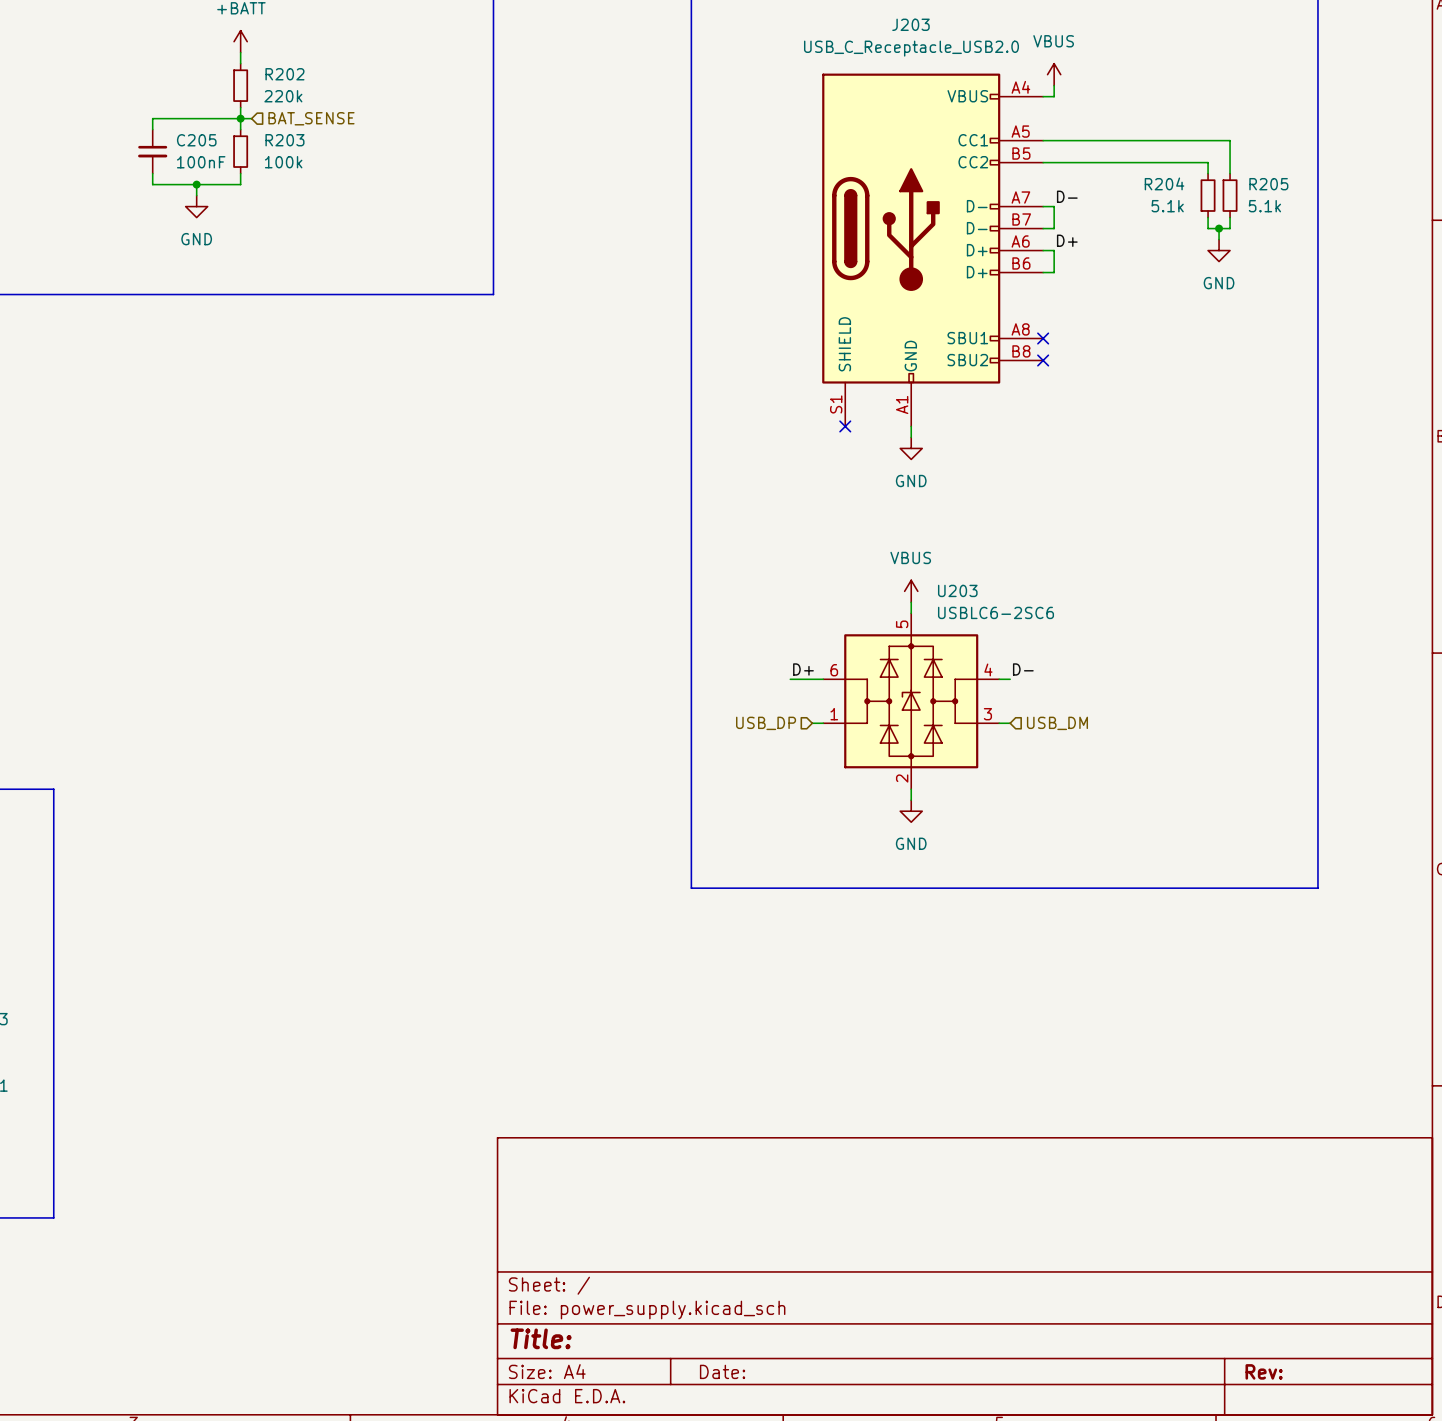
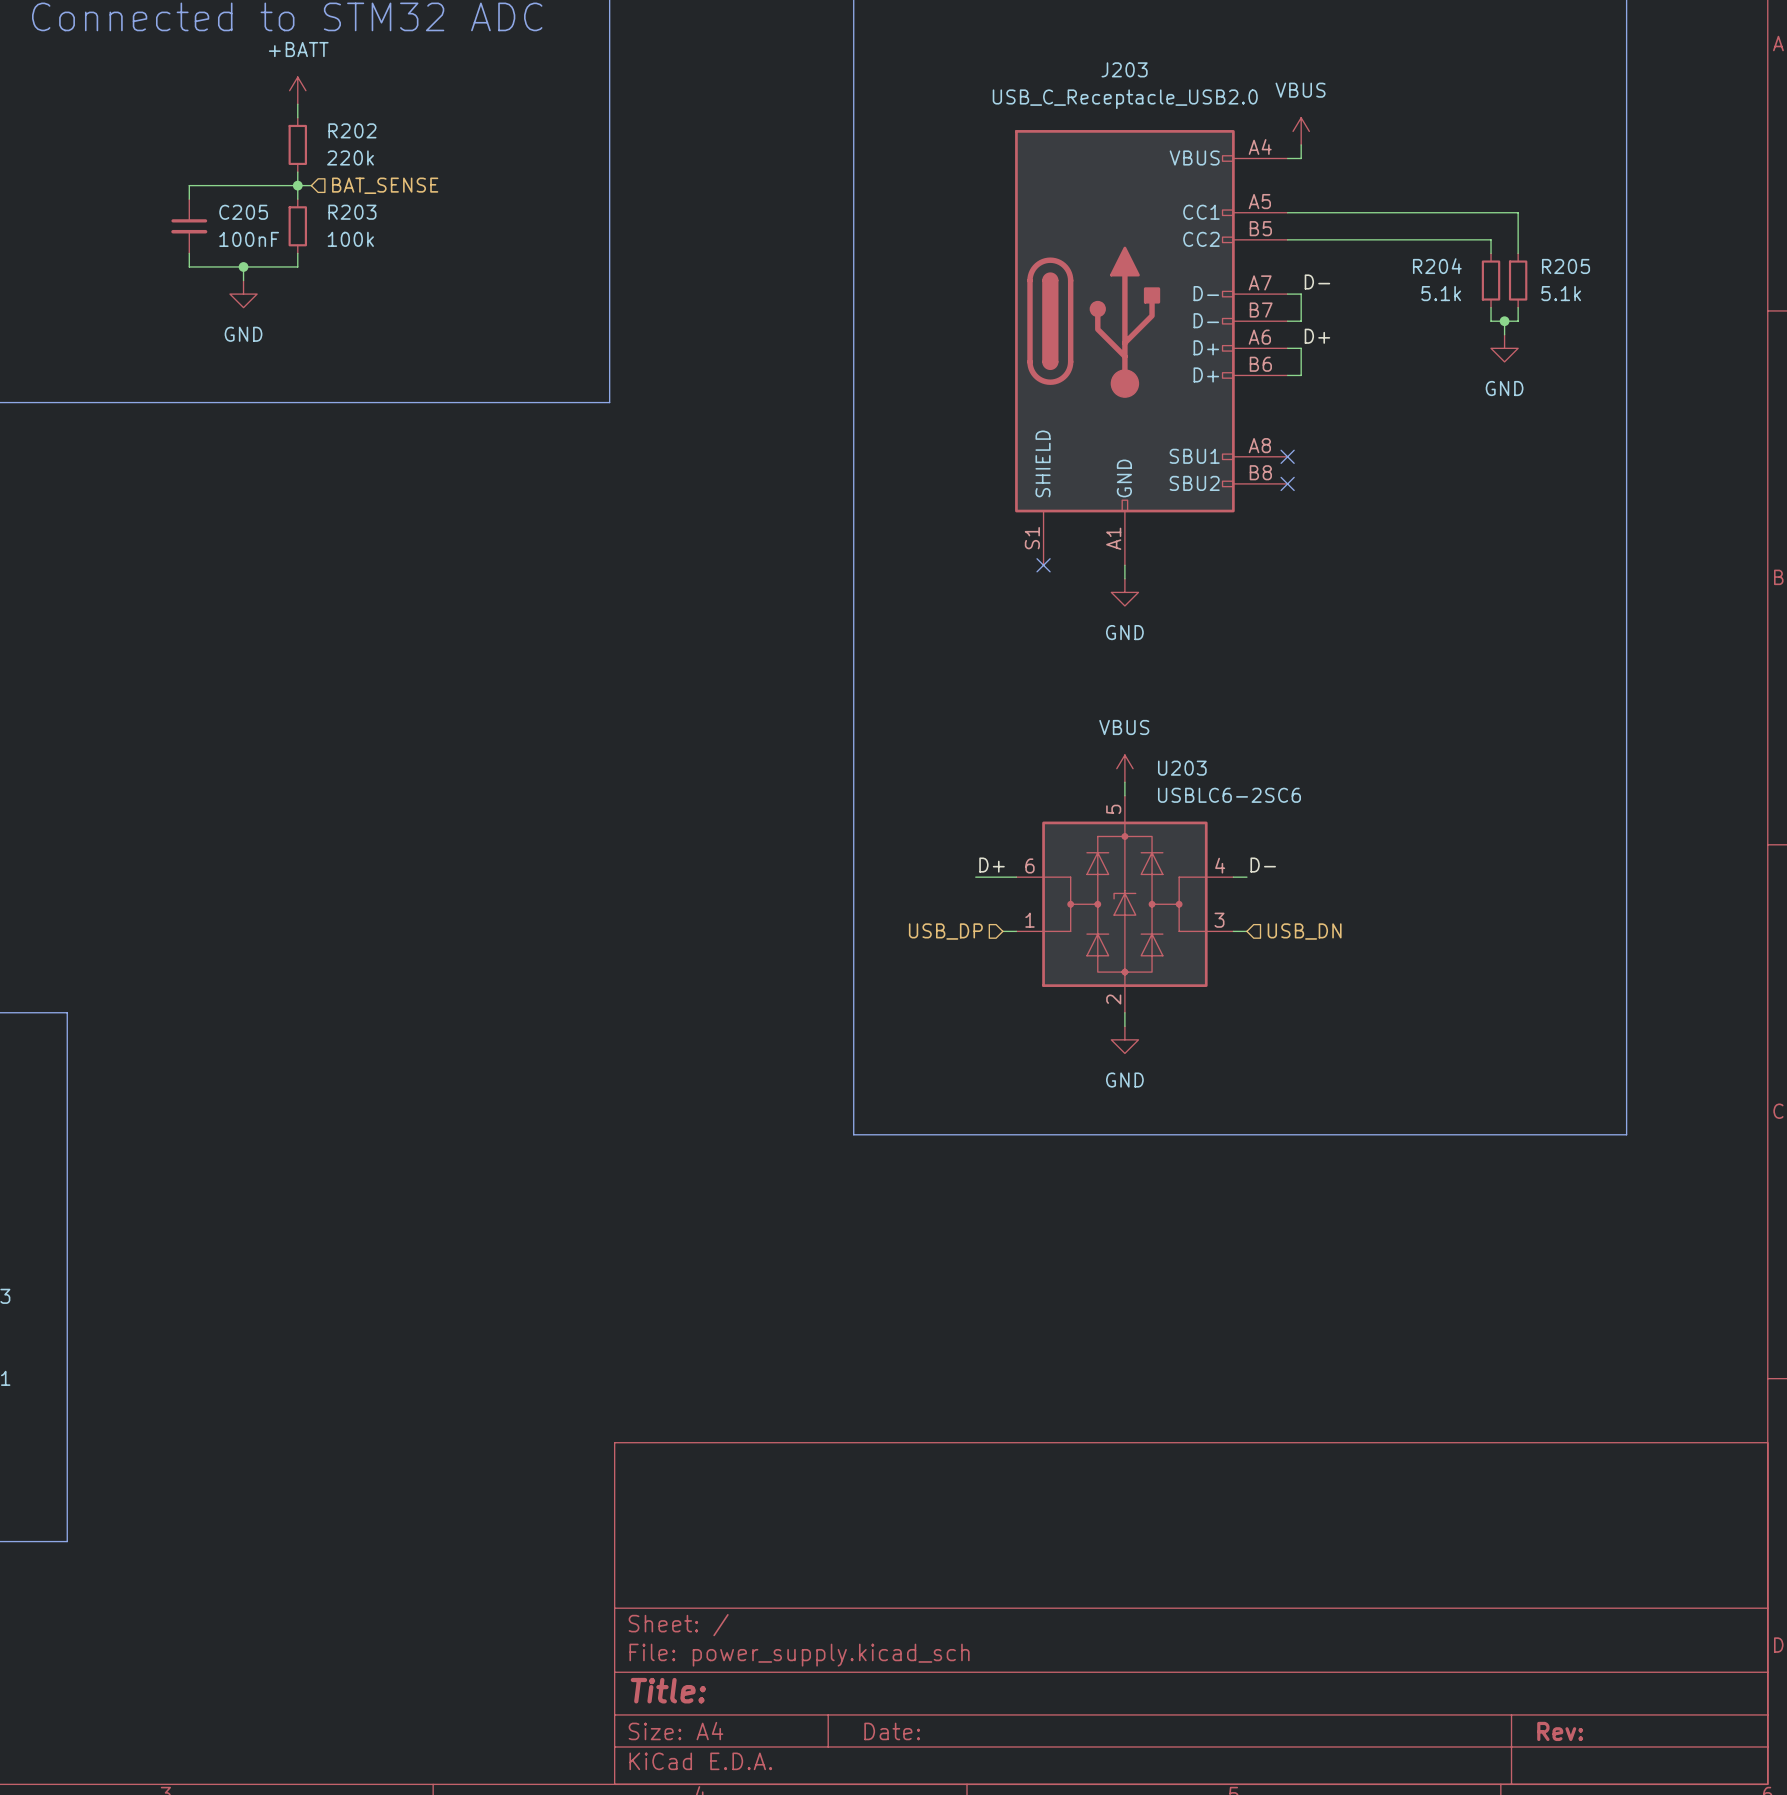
hierarchical label: USB_DM (1057, 723) -> USB_DN (1304, 931)

